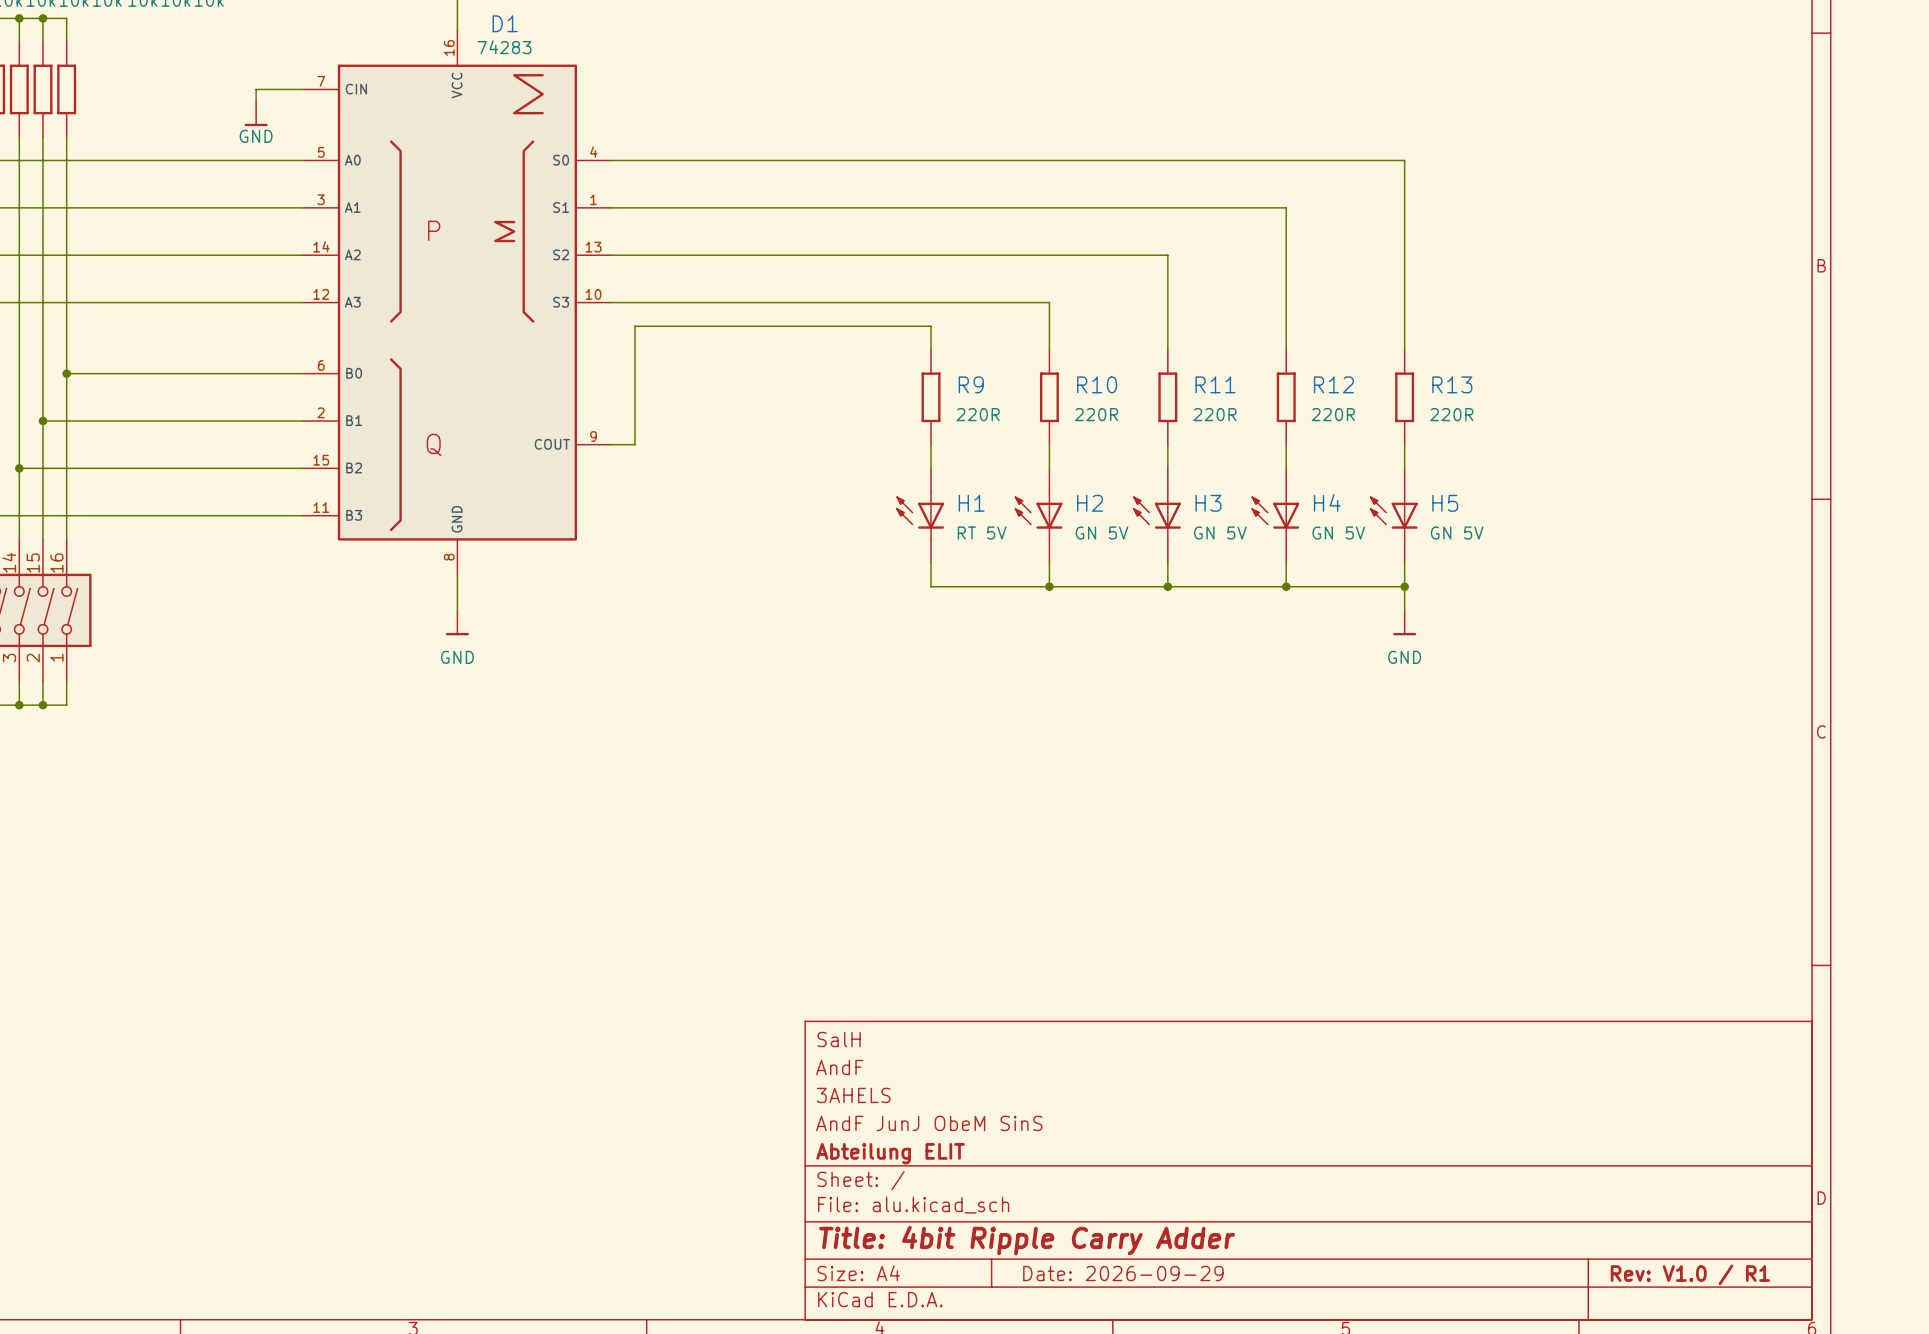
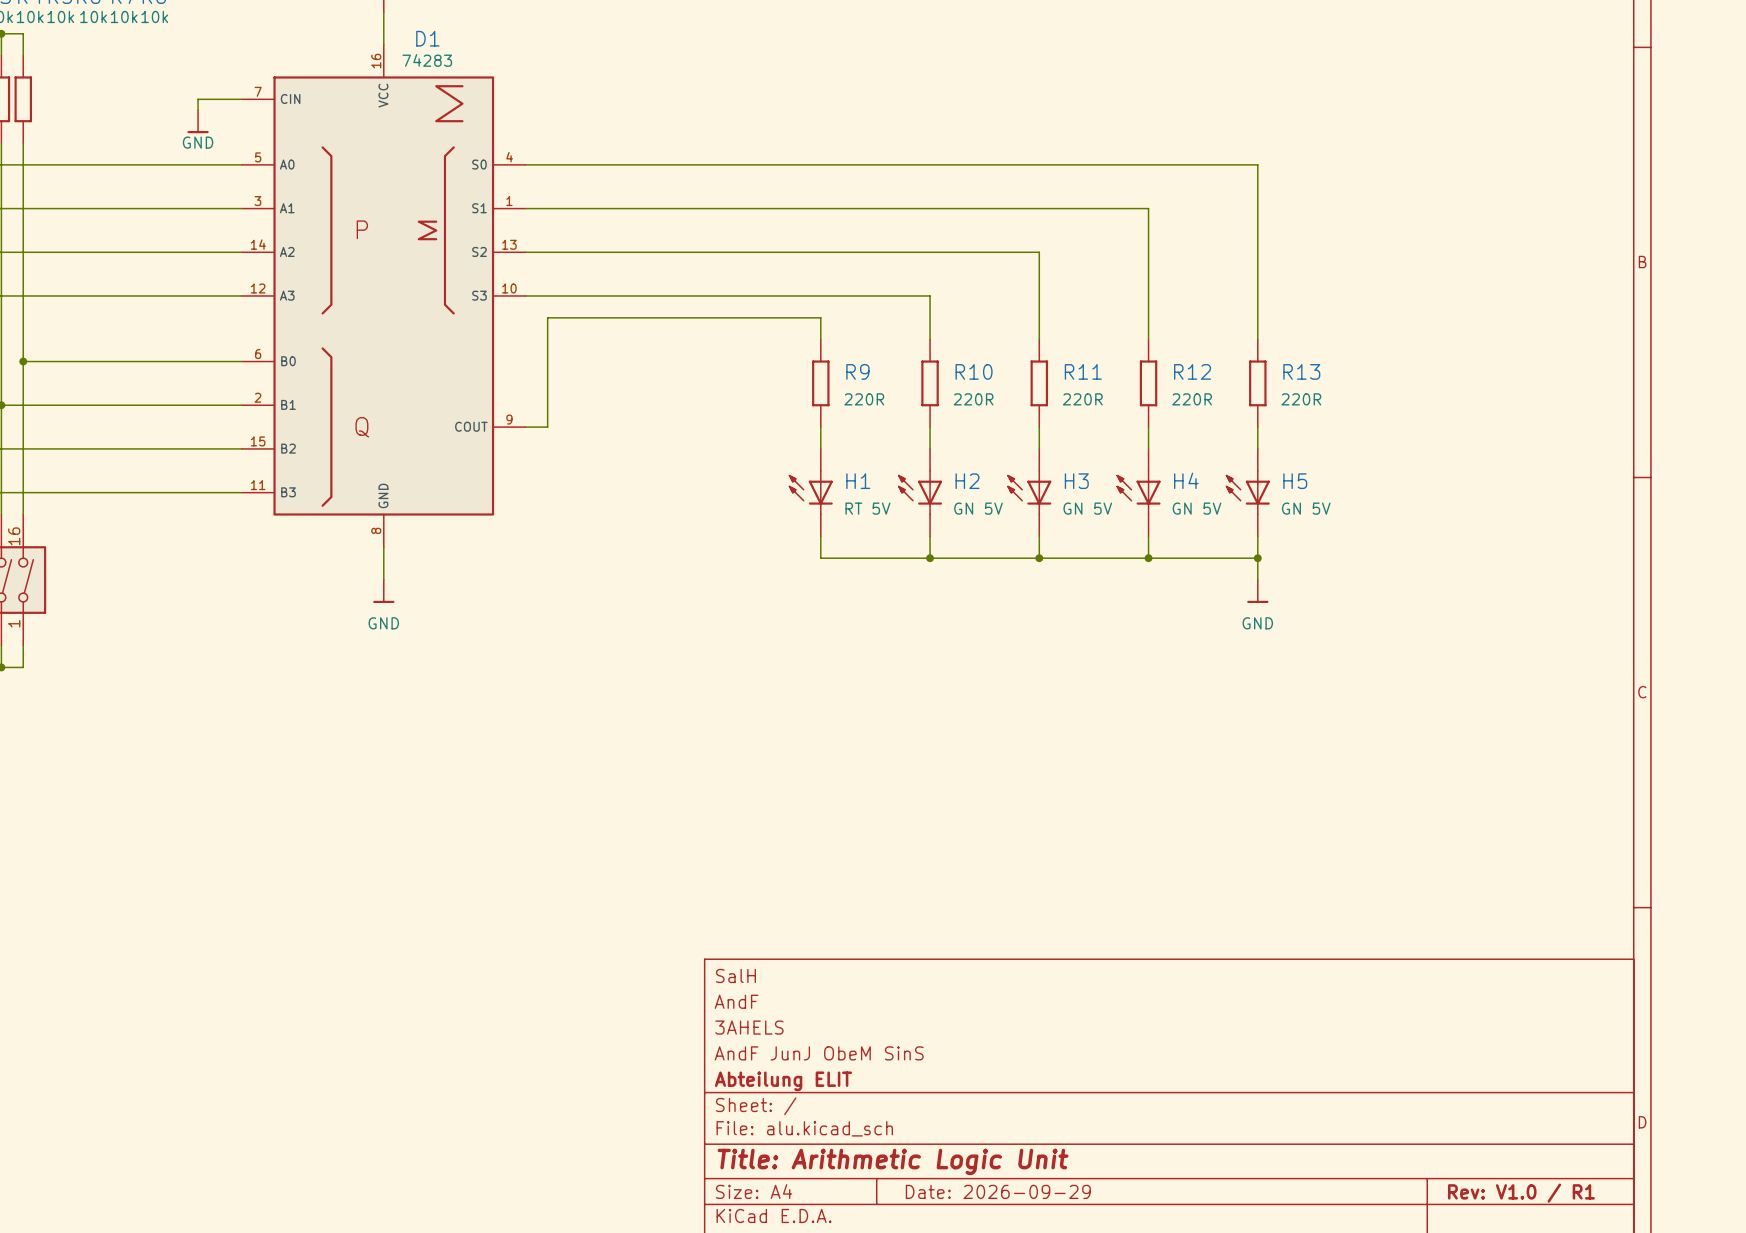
title block: Title: 4bit Ripple Carry Adder (1027, 1240) -> Title: Arithmetic Logic Unit (893, 1161)

